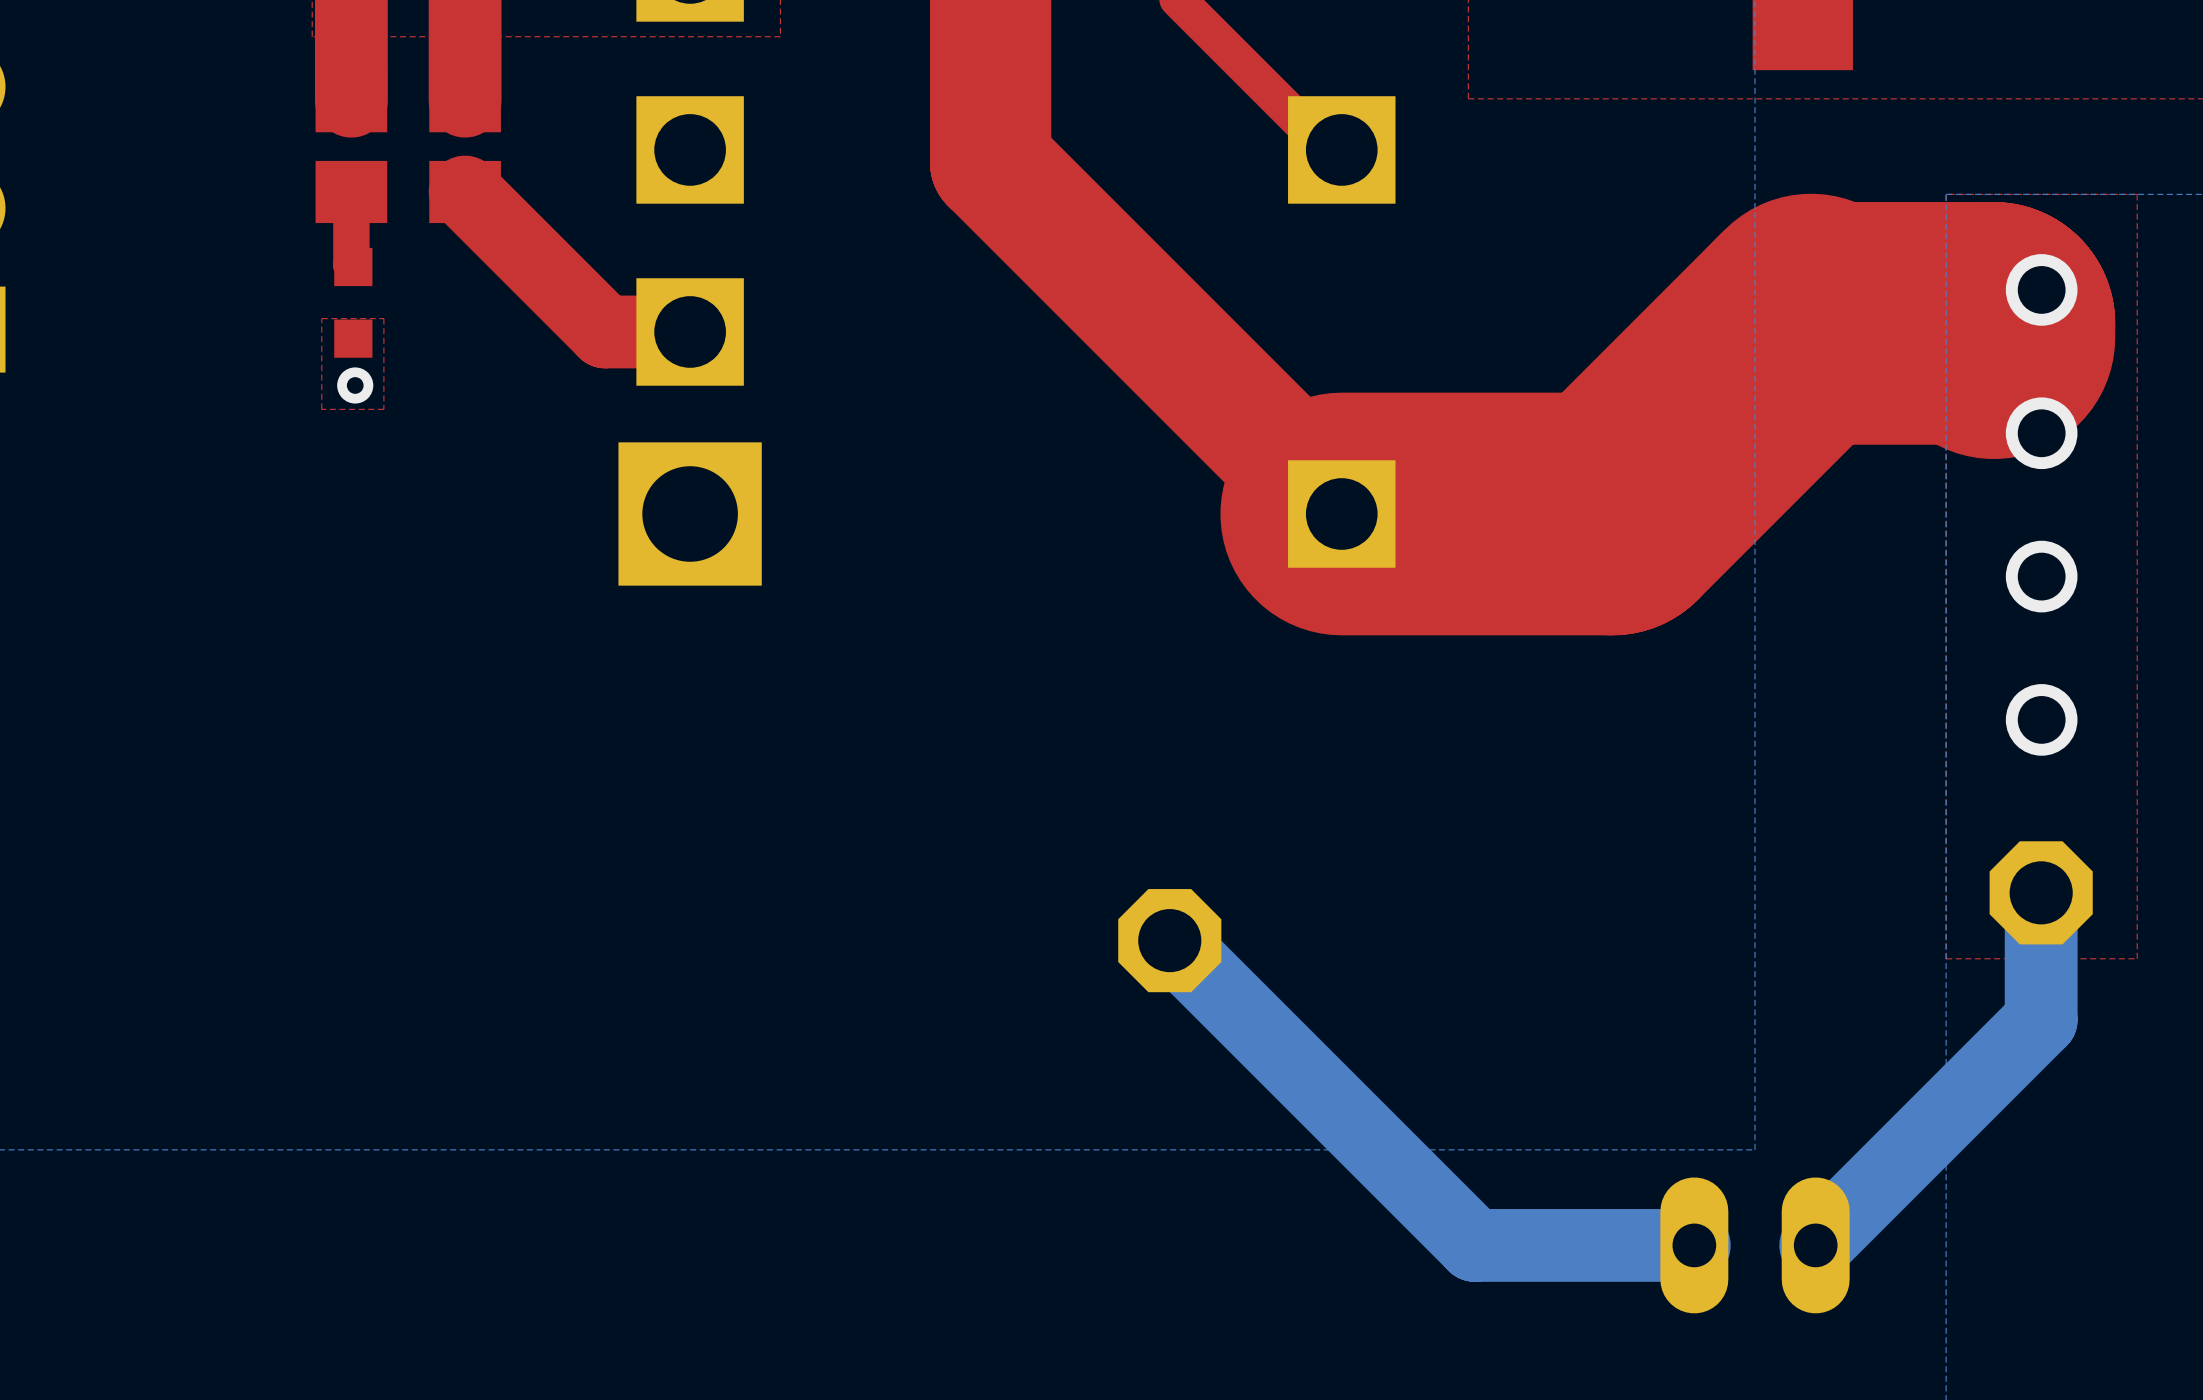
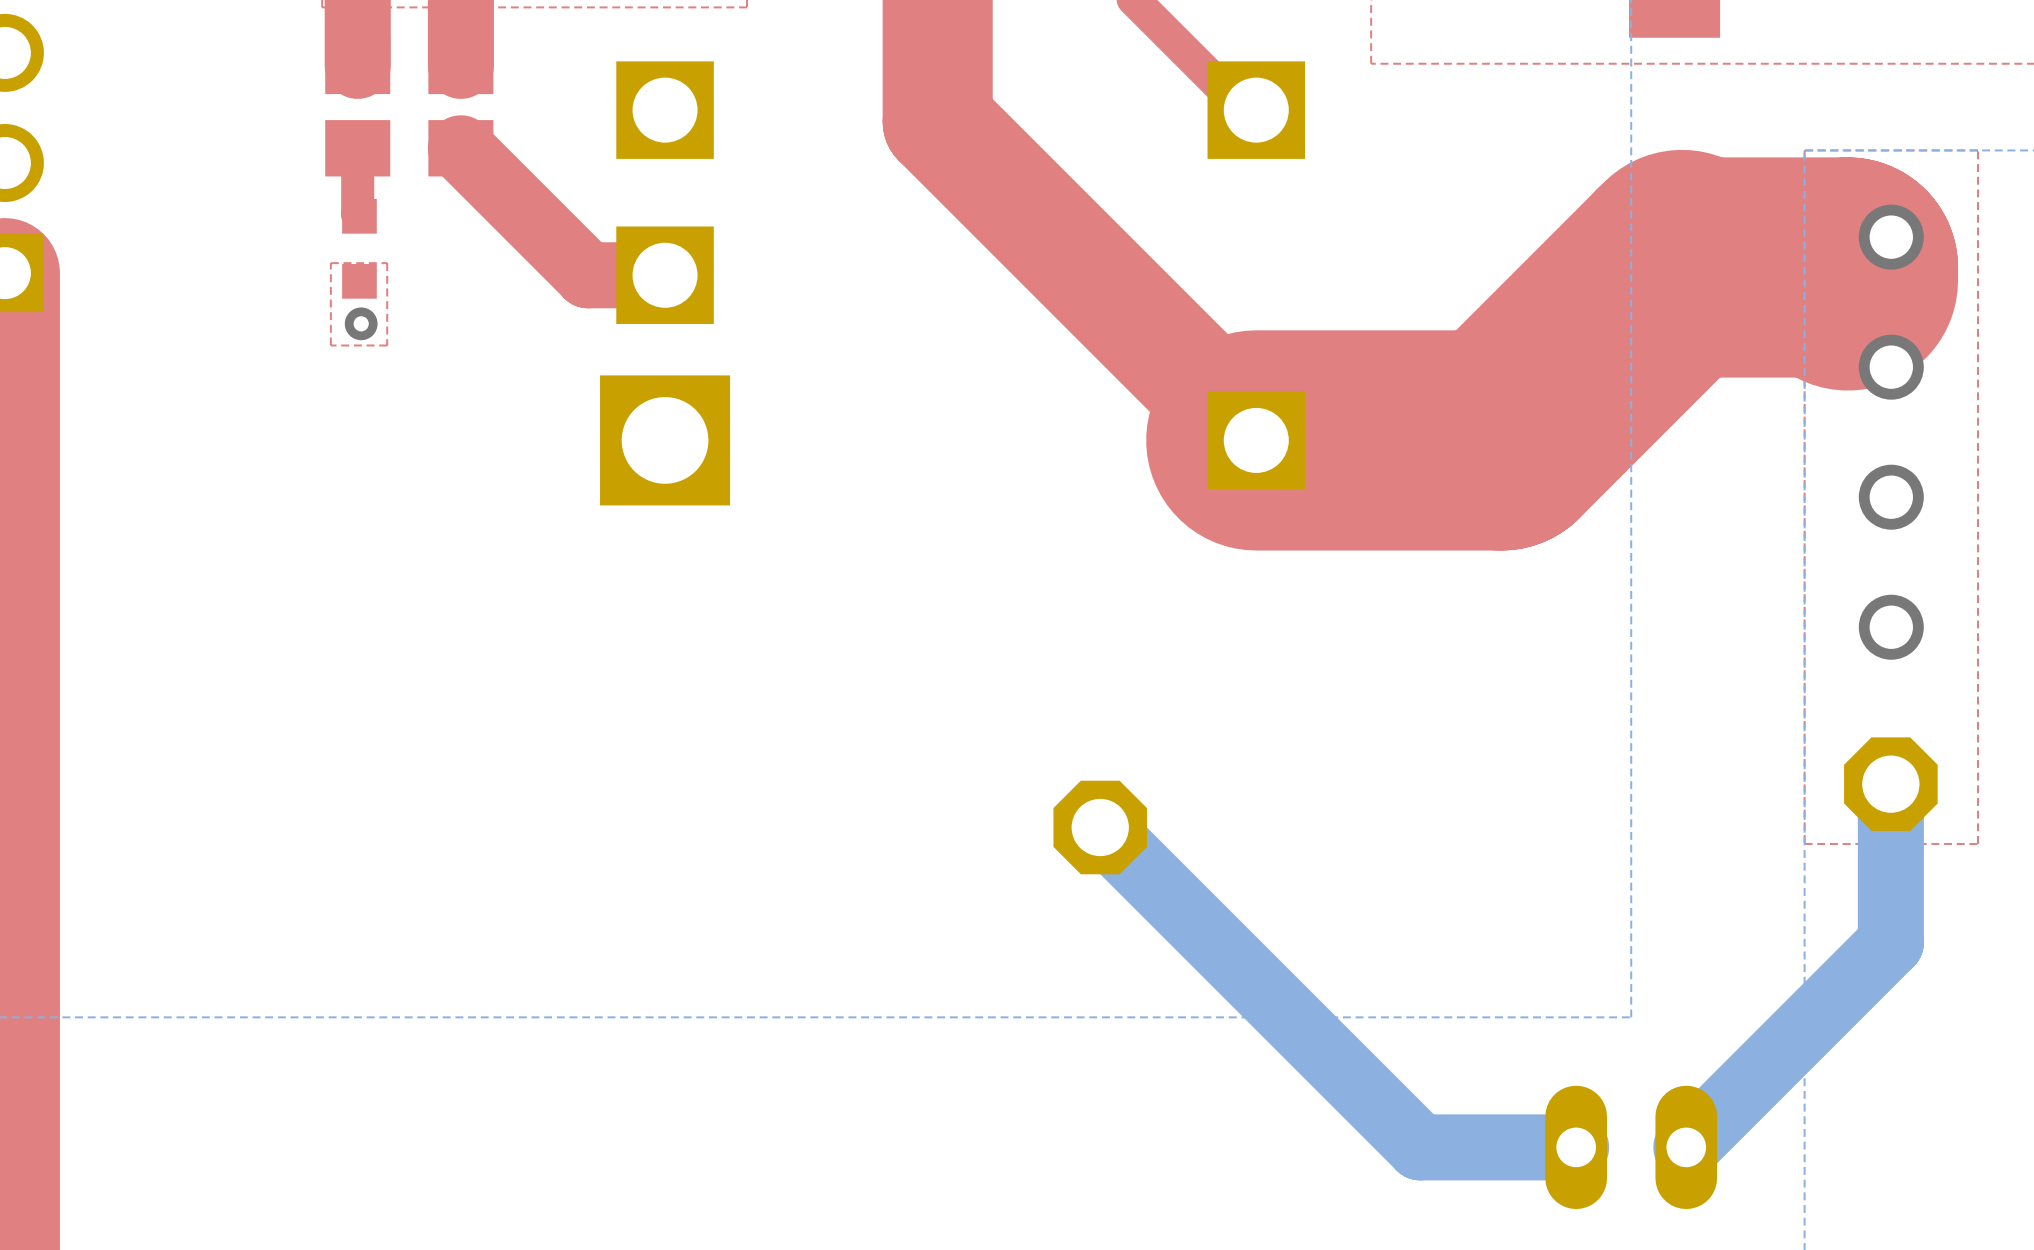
bottom track: (2041, 1019) (1815, 1245) -> (1890, 899) (1890, 942) (1686, 1147)
bottom track: (1694, 1245) (1474, 1245) -> (1576, 1147) (1420, 1147) (1376, 1104)
part position: (1755, 1245) -> (1631, 1147)

